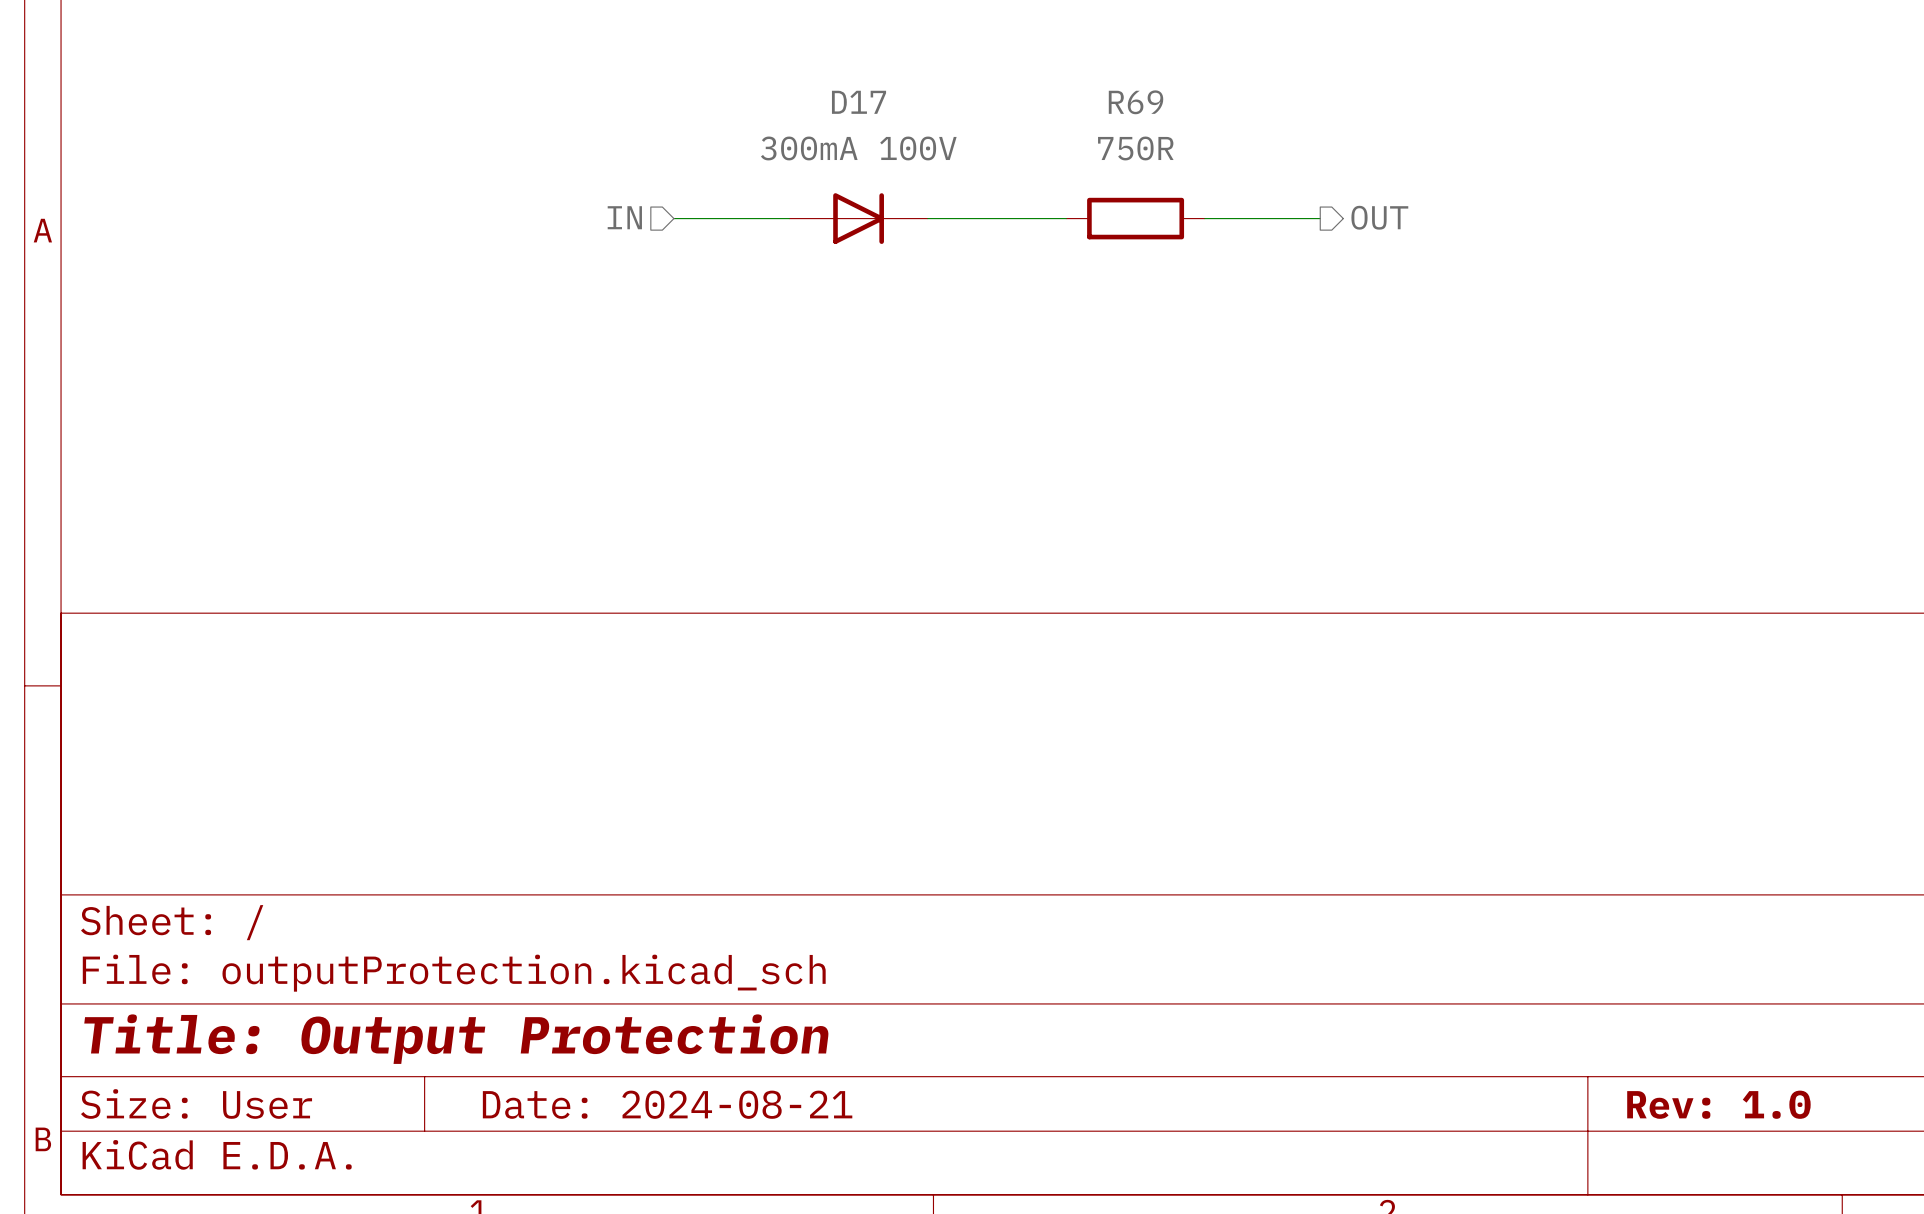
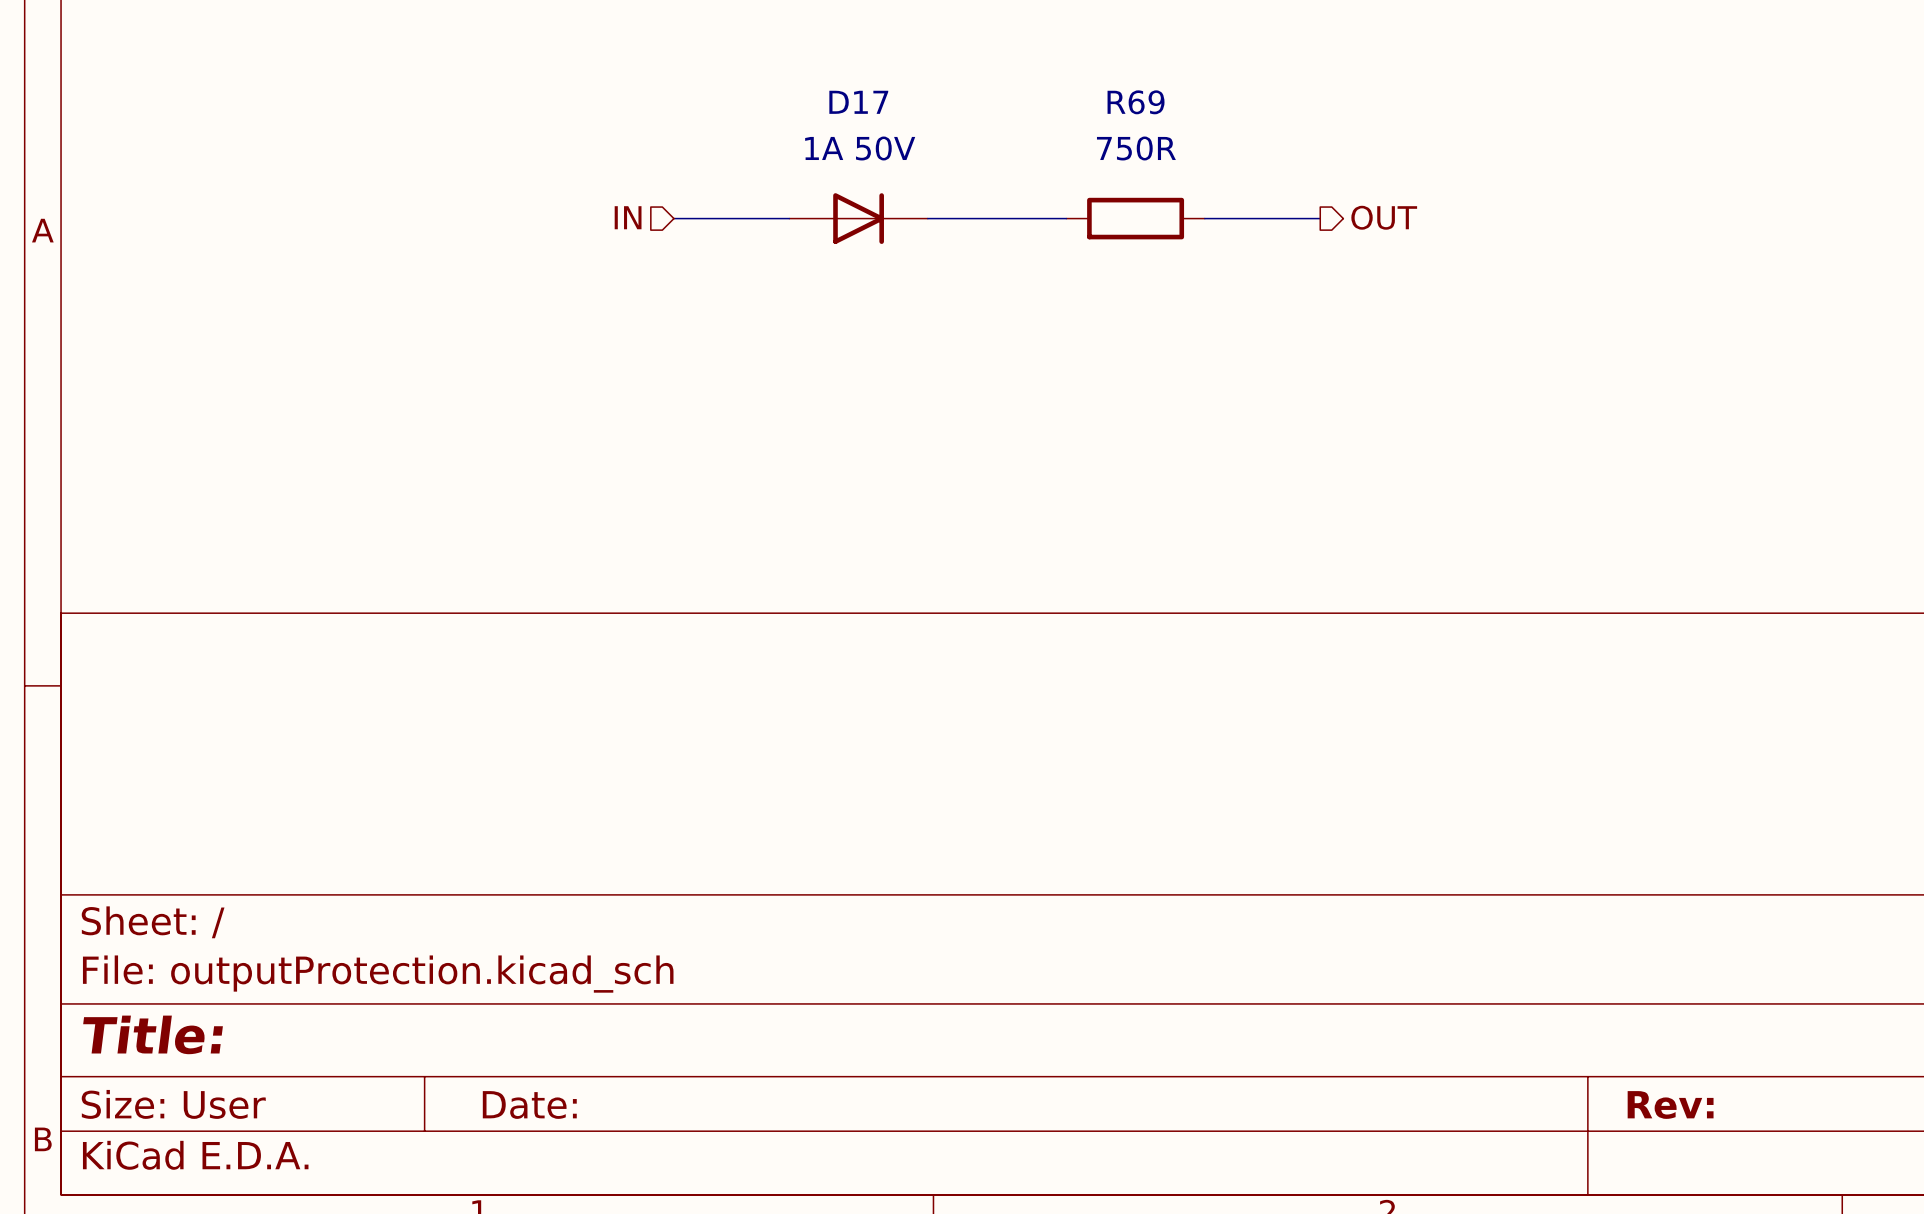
D17 value: 300mA 100V (858, 148) -> 1A 50V (860, 148)
title block: Title: Output Protection (456, 1039) -> Title: (153, 1034)
title block: Date: 2024-08-21 (667, 1104) -> Date: (529, 1104)
title block: Rev: 1.0 (1718, 1104) -> Rev: (1670, 1104)

